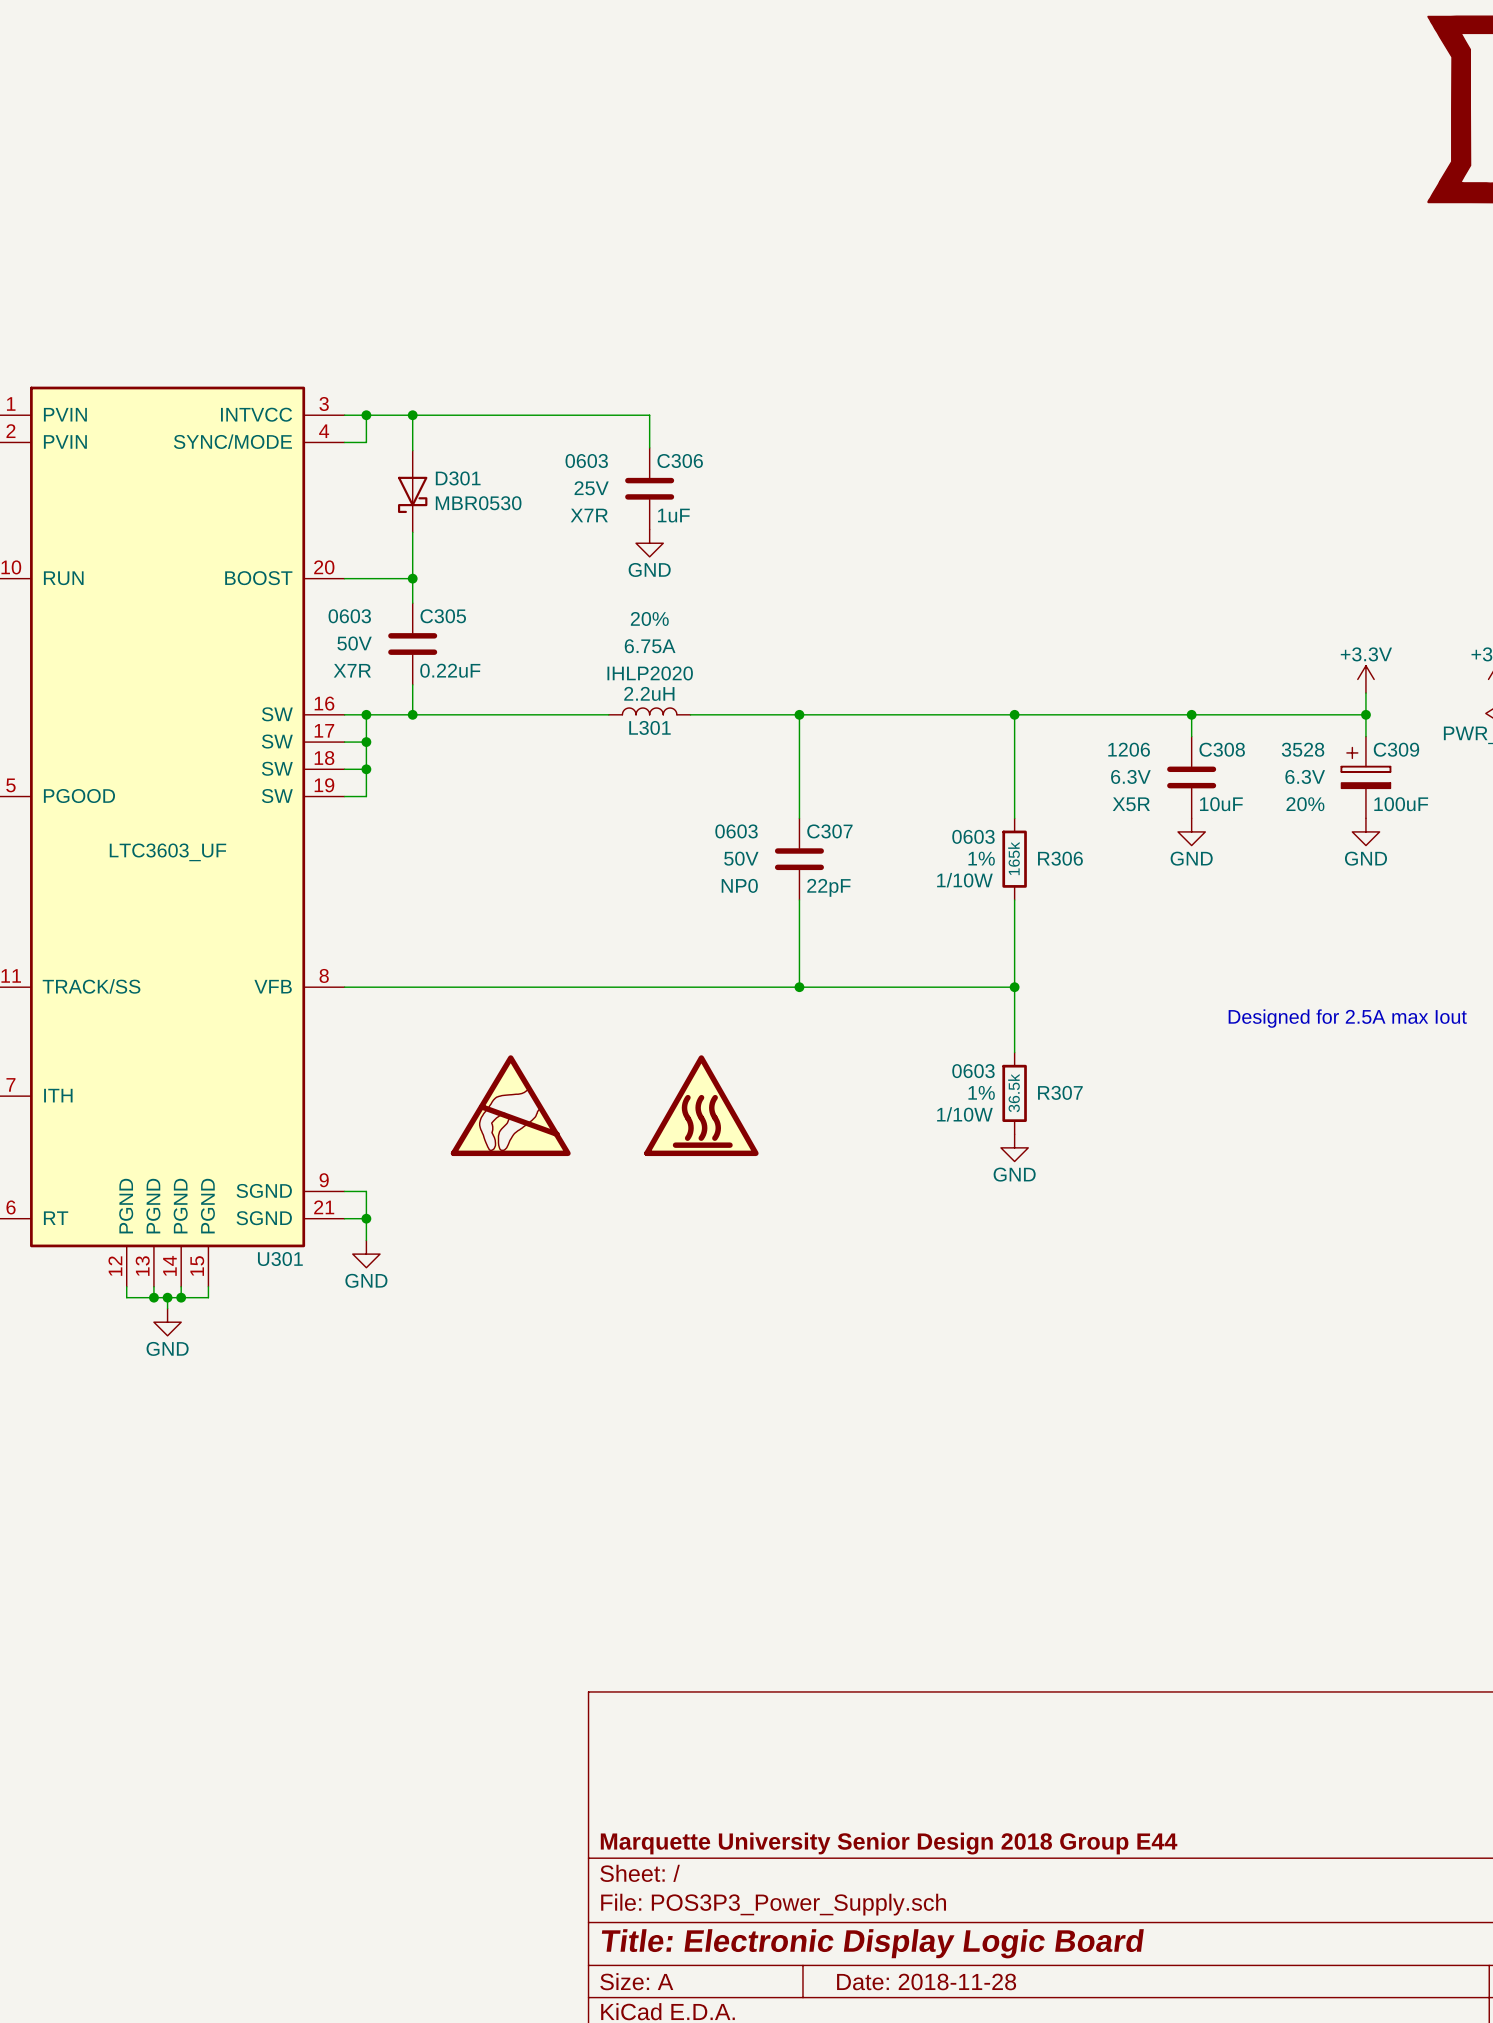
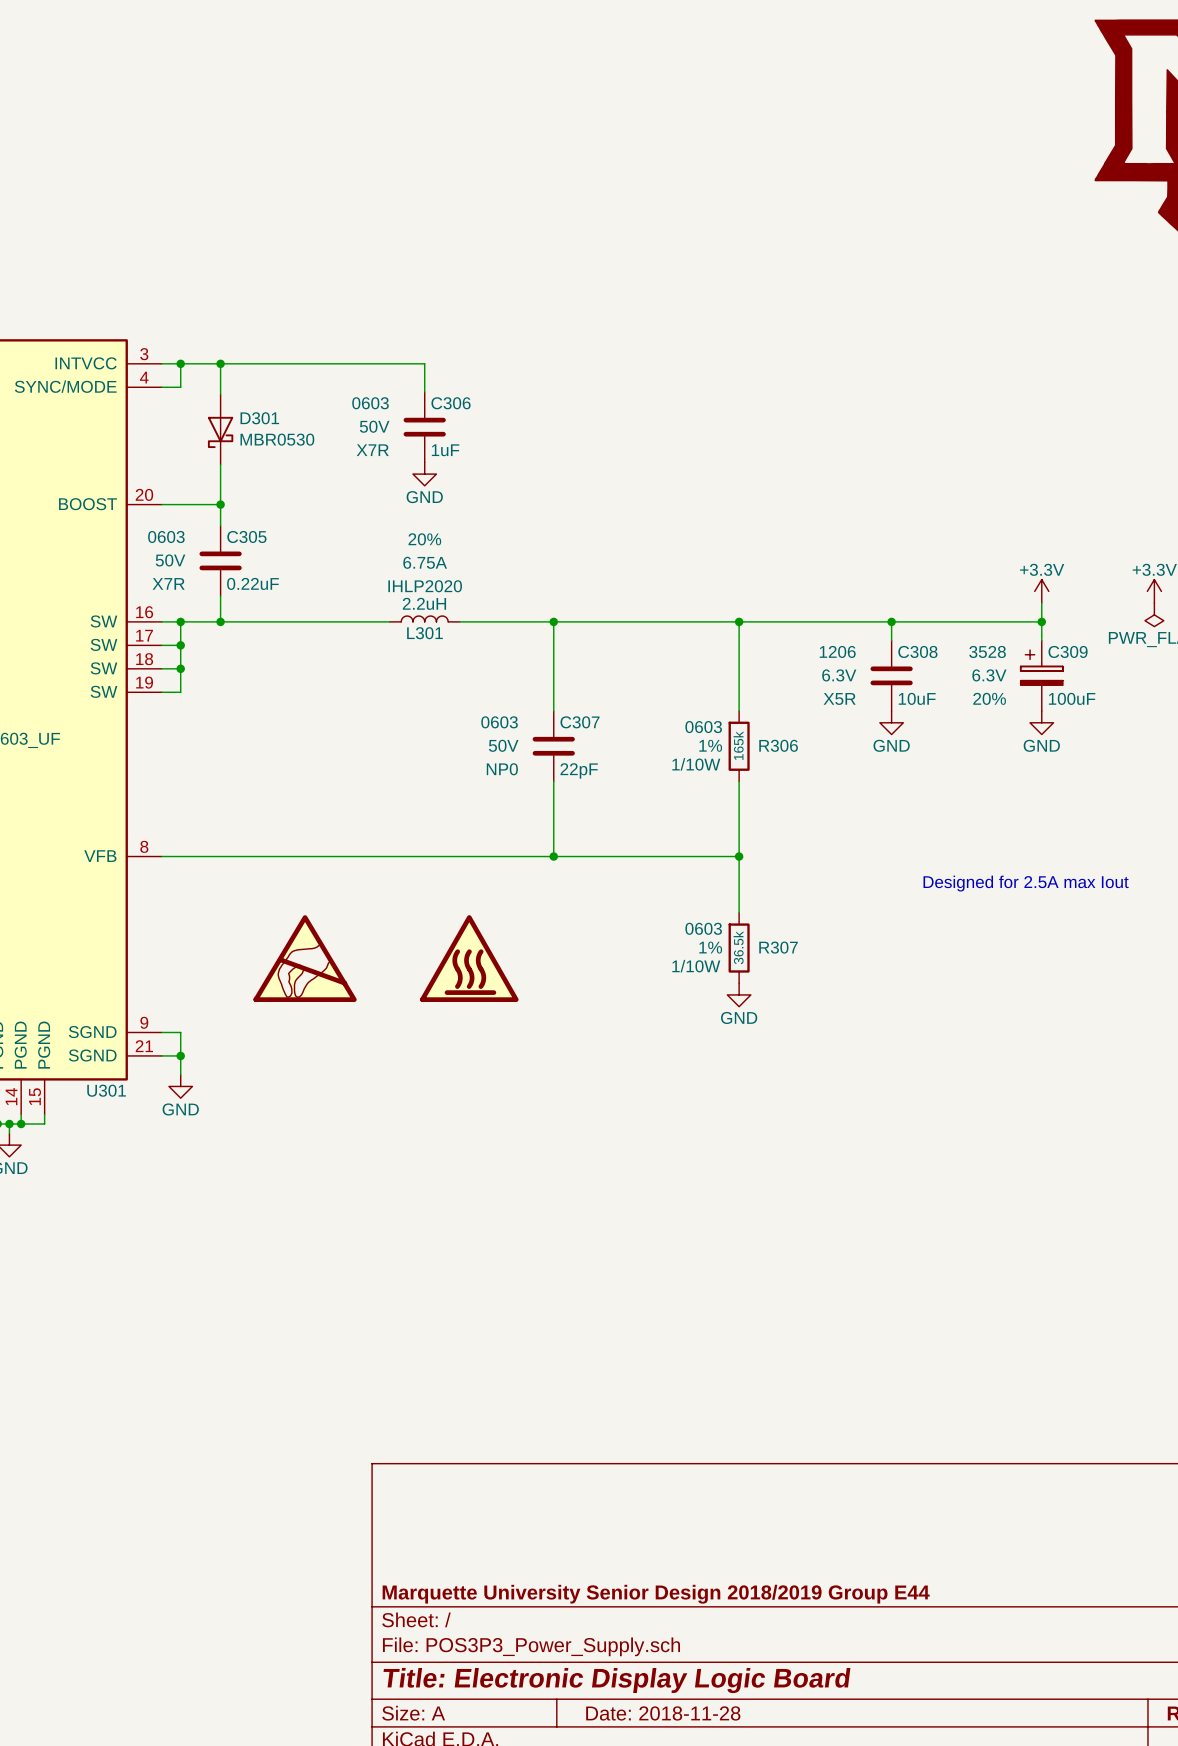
C306 text: 25V (591, 488) -> 50V (374, 426)
title block: Marquette University Senior Design 2018 Group E44 (889, 1843) -> Marquette University Senior Design 2018/2019 Group E44 (656, 1594)

